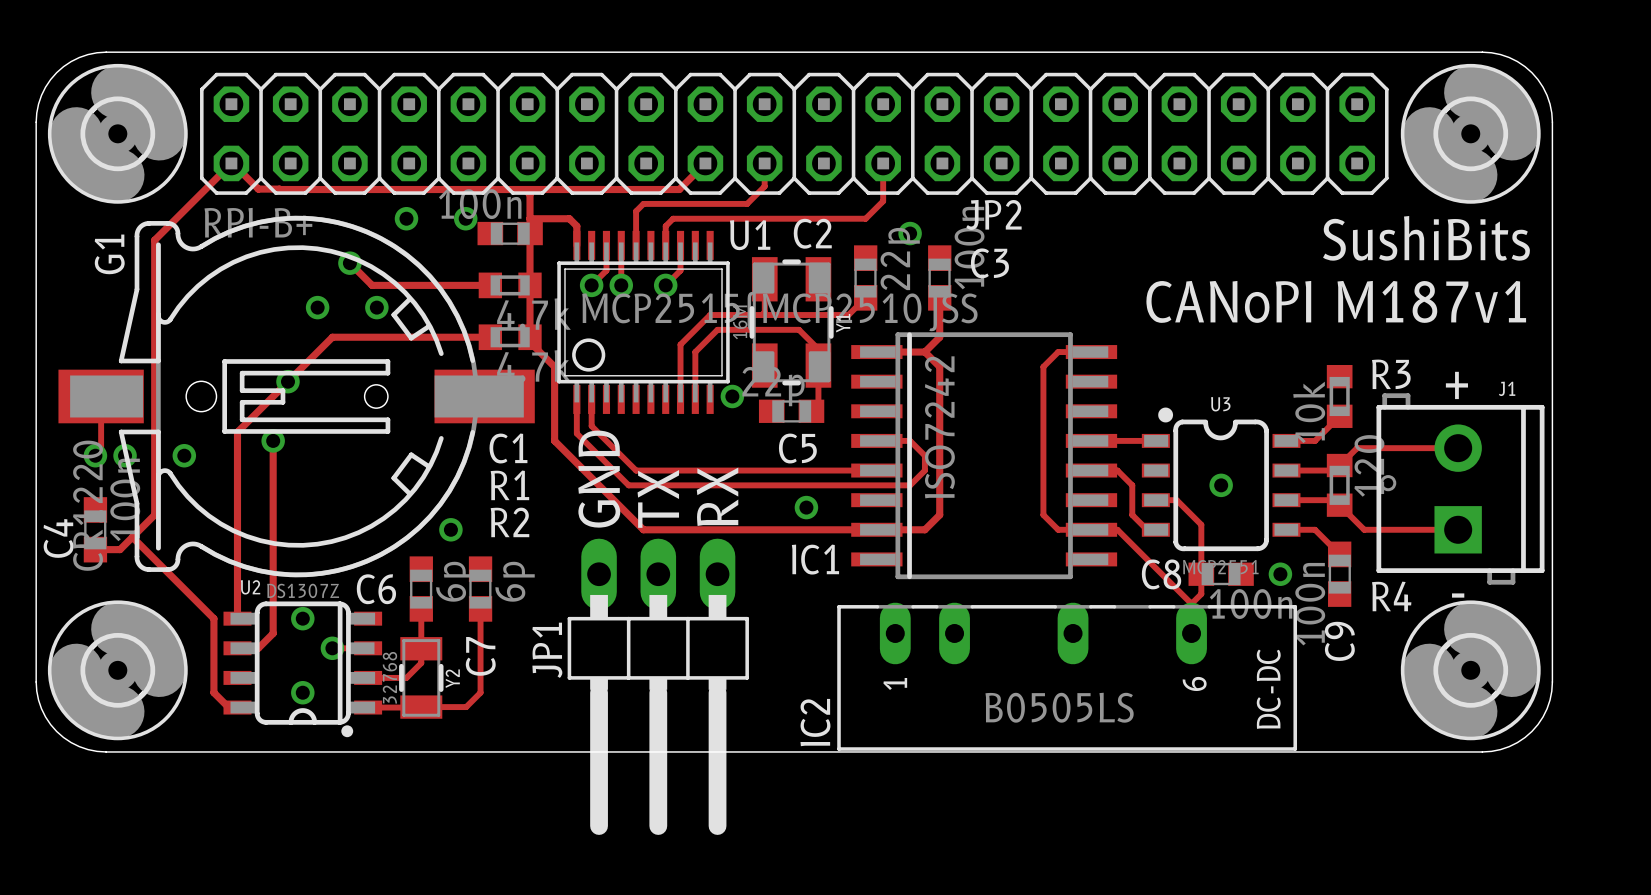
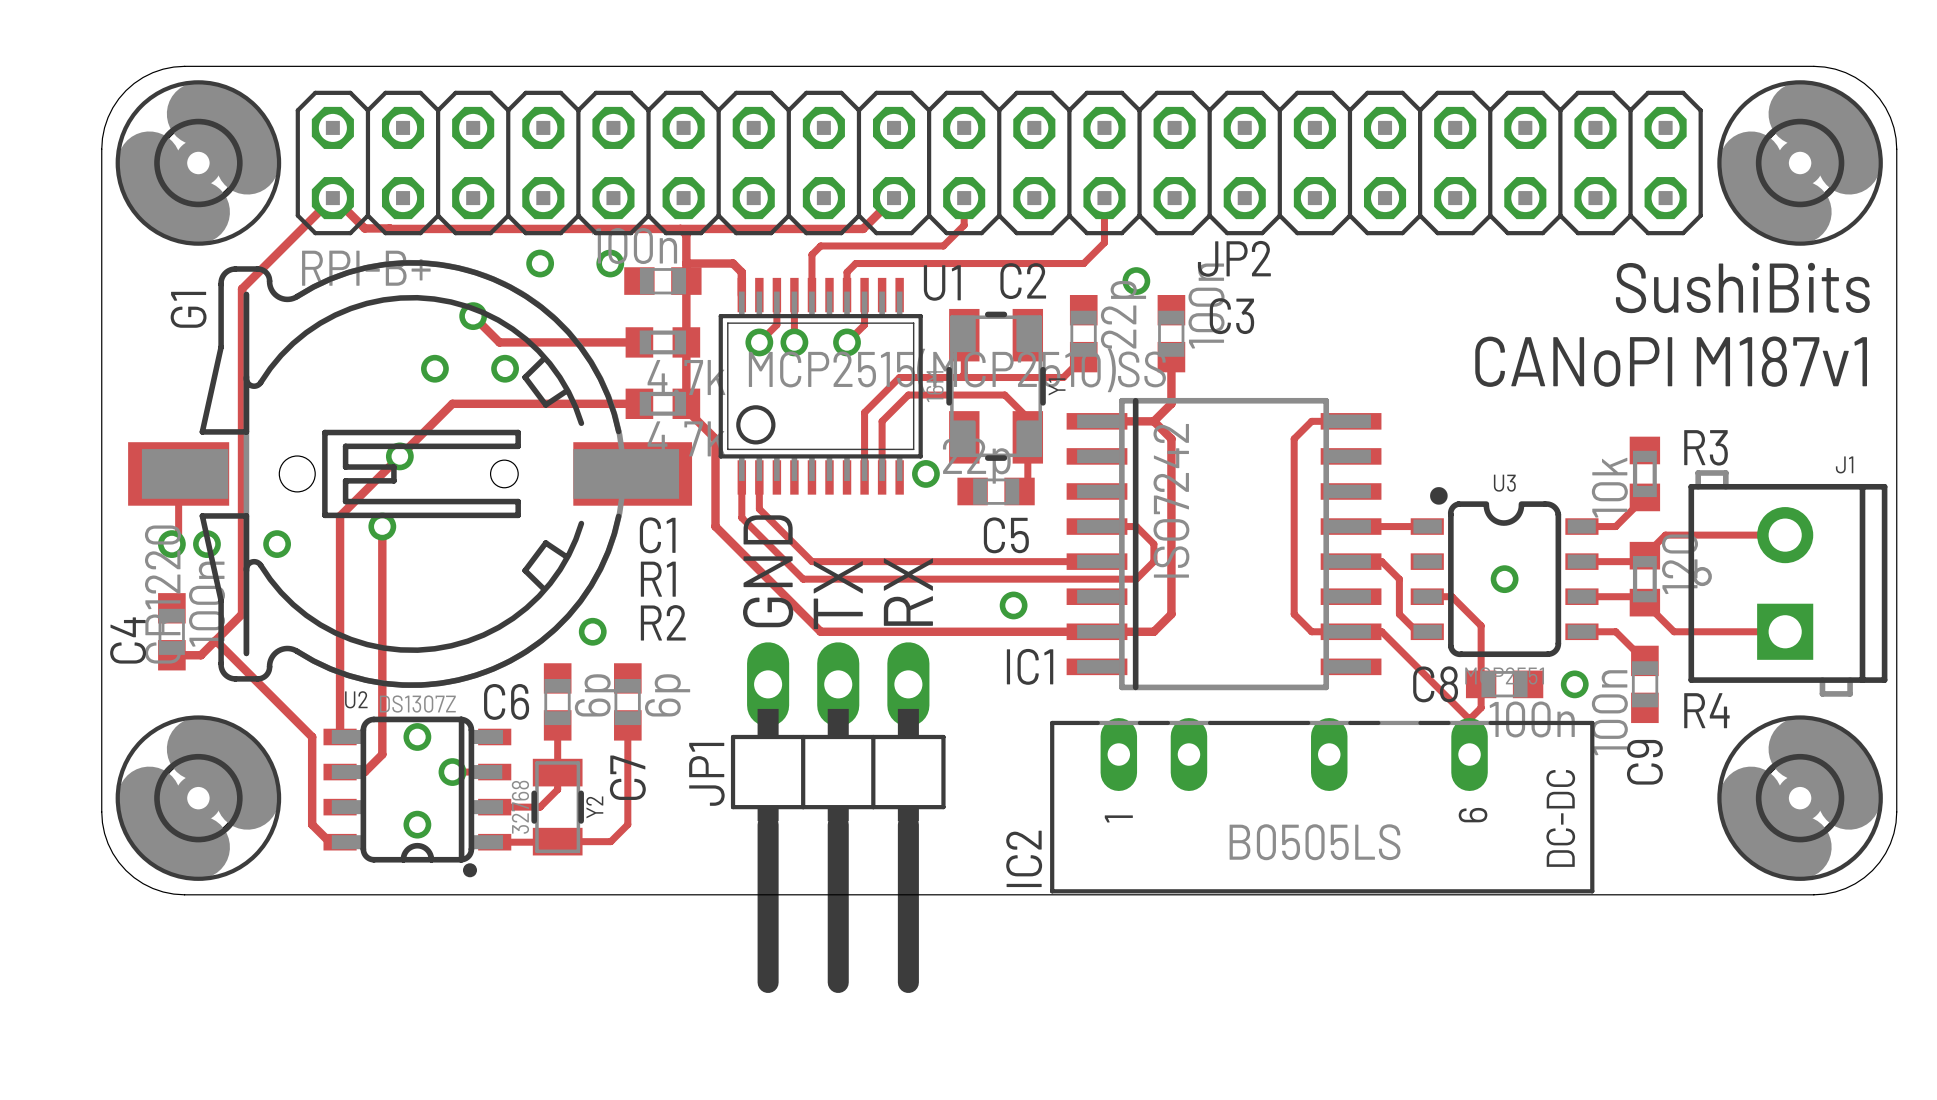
text: + (1456, 385) -> none
text: - (1458, 595) -> none

